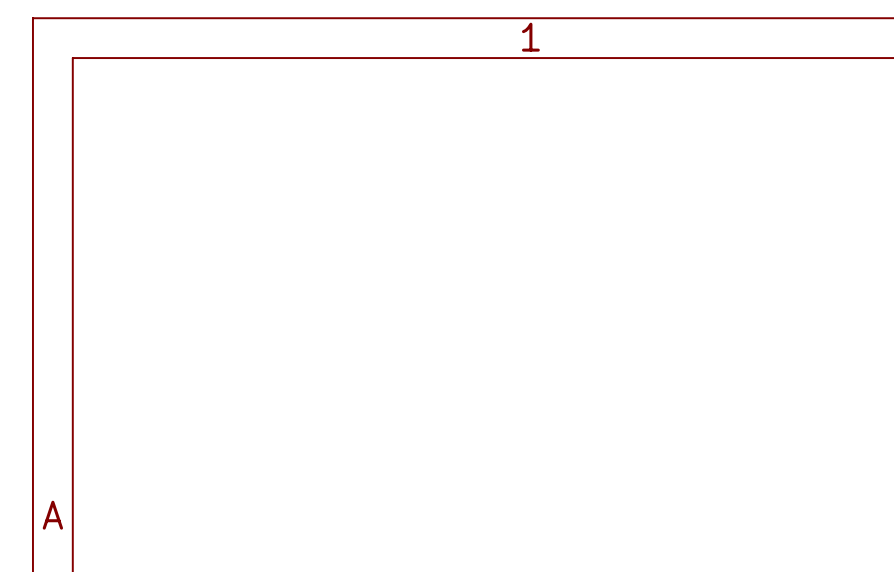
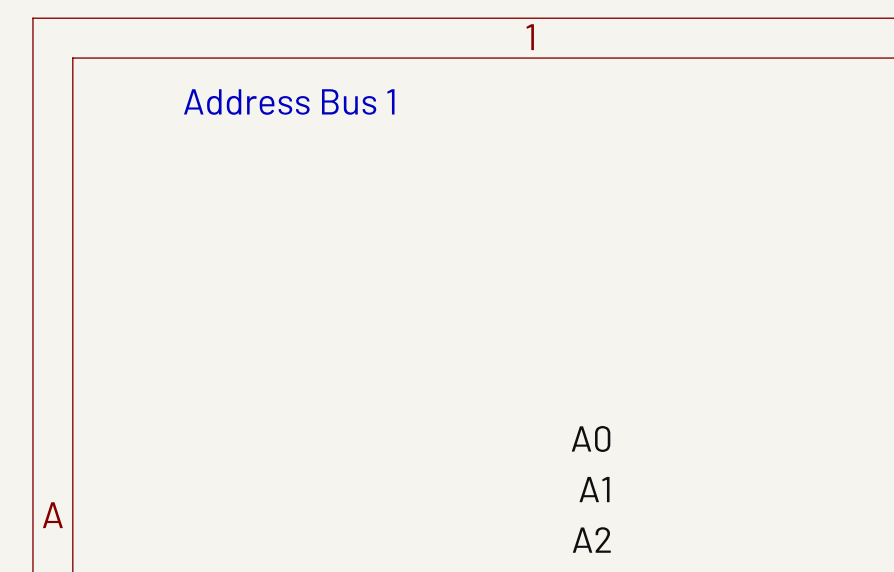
text: none -> Address Bus 1 (289, 102)
label: none -> A0 (591, 438)
label: none -> A1 (594, 489)
label: none -> A2 (591, 540)

